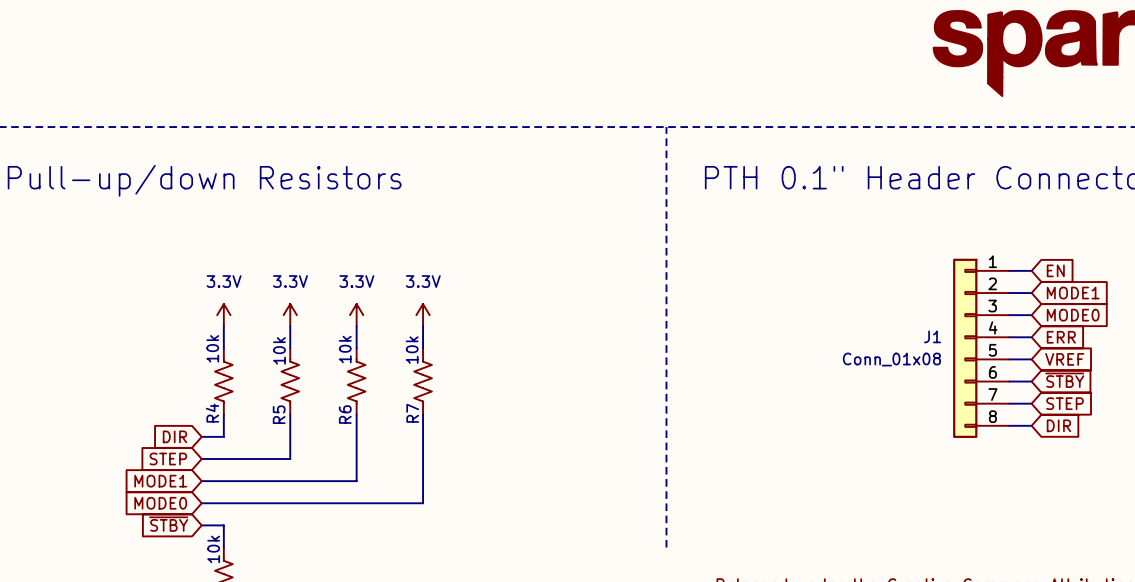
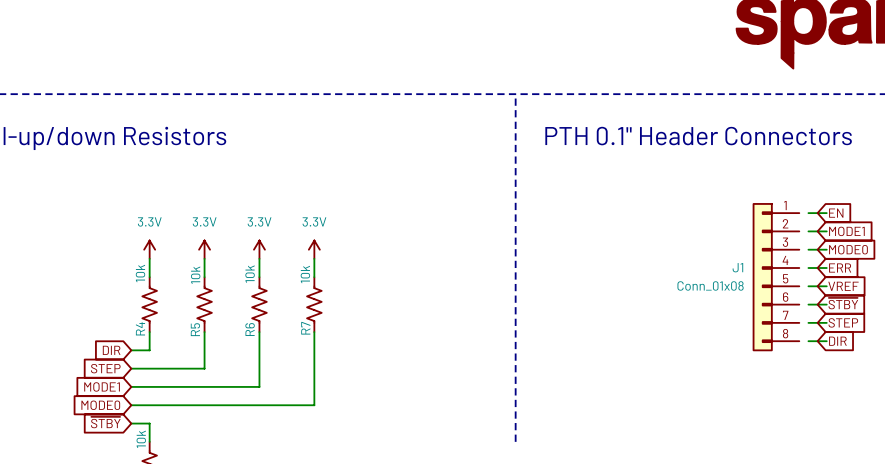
wire: (1009, 270) (1020, 270) -> (817, 213) (826, 213)
wire: (1009, 293) (1020, 293) -> (817, 231) (826, 231)
wire: (1009, 315) (1020, 315) -> (817, 249) (826, 249)
wire: (1009, 337) (1020, 337) -> (817, 268) (826, 268)
wire: (1009, 359) (1020, 359) -> (817, 286) (826, 286)
wire: (1009, 381) (1020, 381) -> (817, 304) (826, 304)
wire: (1009, 403) (1020, 403) -> (817, 322) (826, 322)
wire: (1009, 425) (1020, 425) -> (817, 341) (826, 341)

